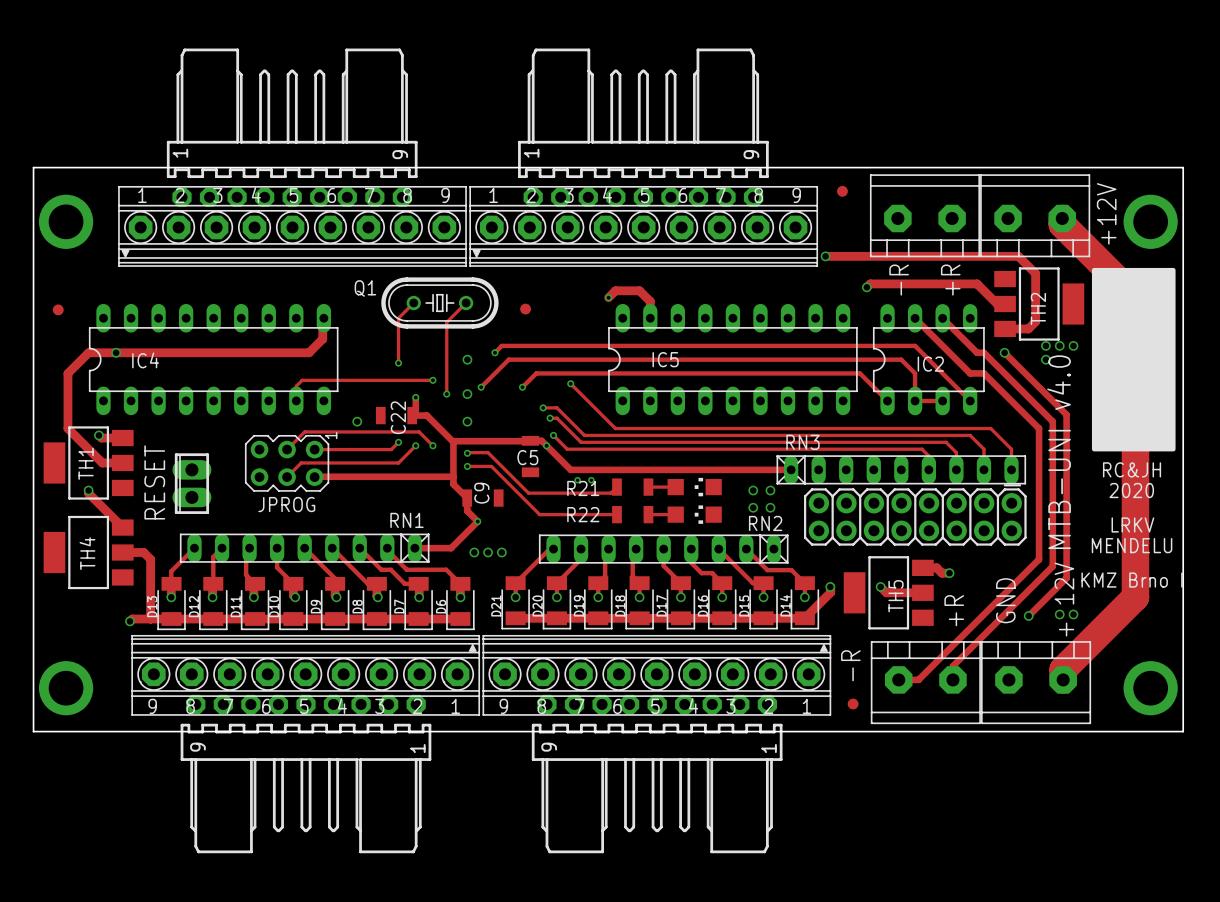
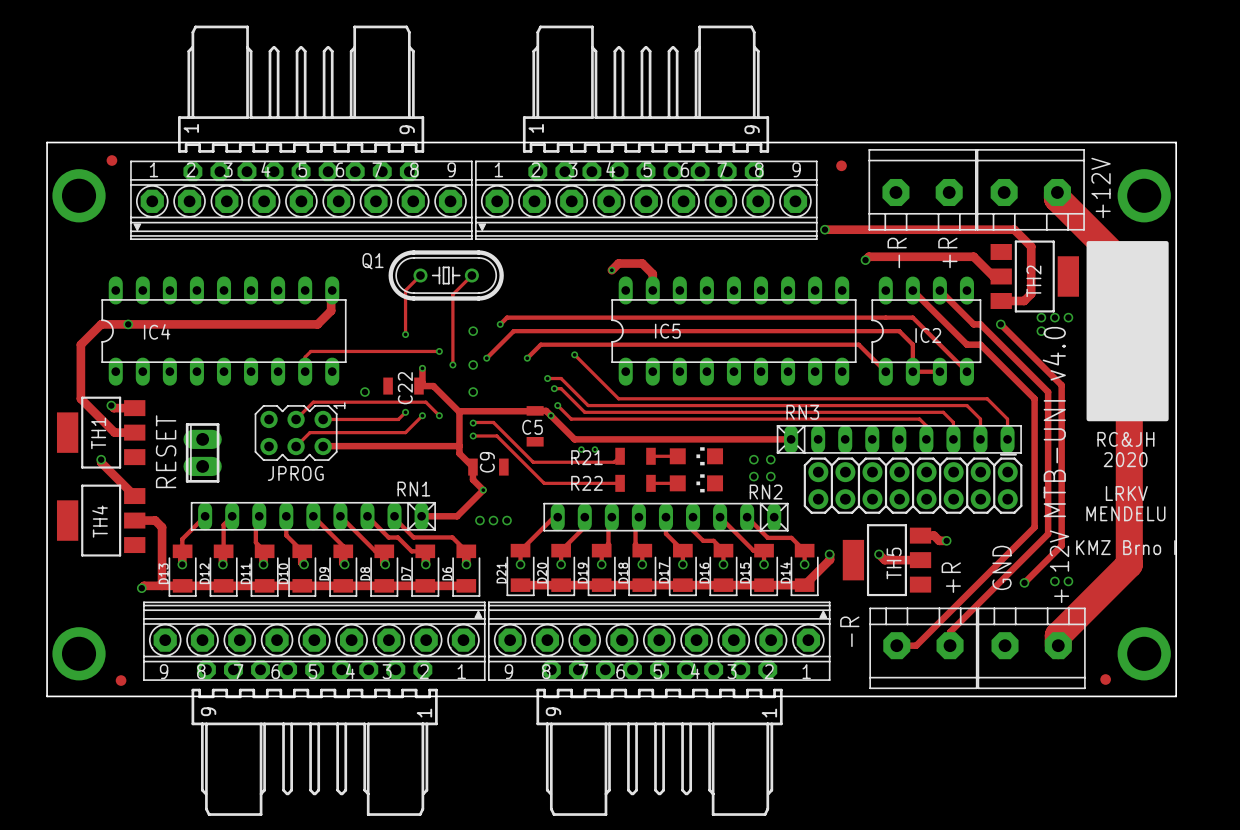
part position: (58, 309) -> (111, 160)
part: (525, 309) -> none
part position: (853, 704) -> (1105, 679)
part: none -> (121, 680)

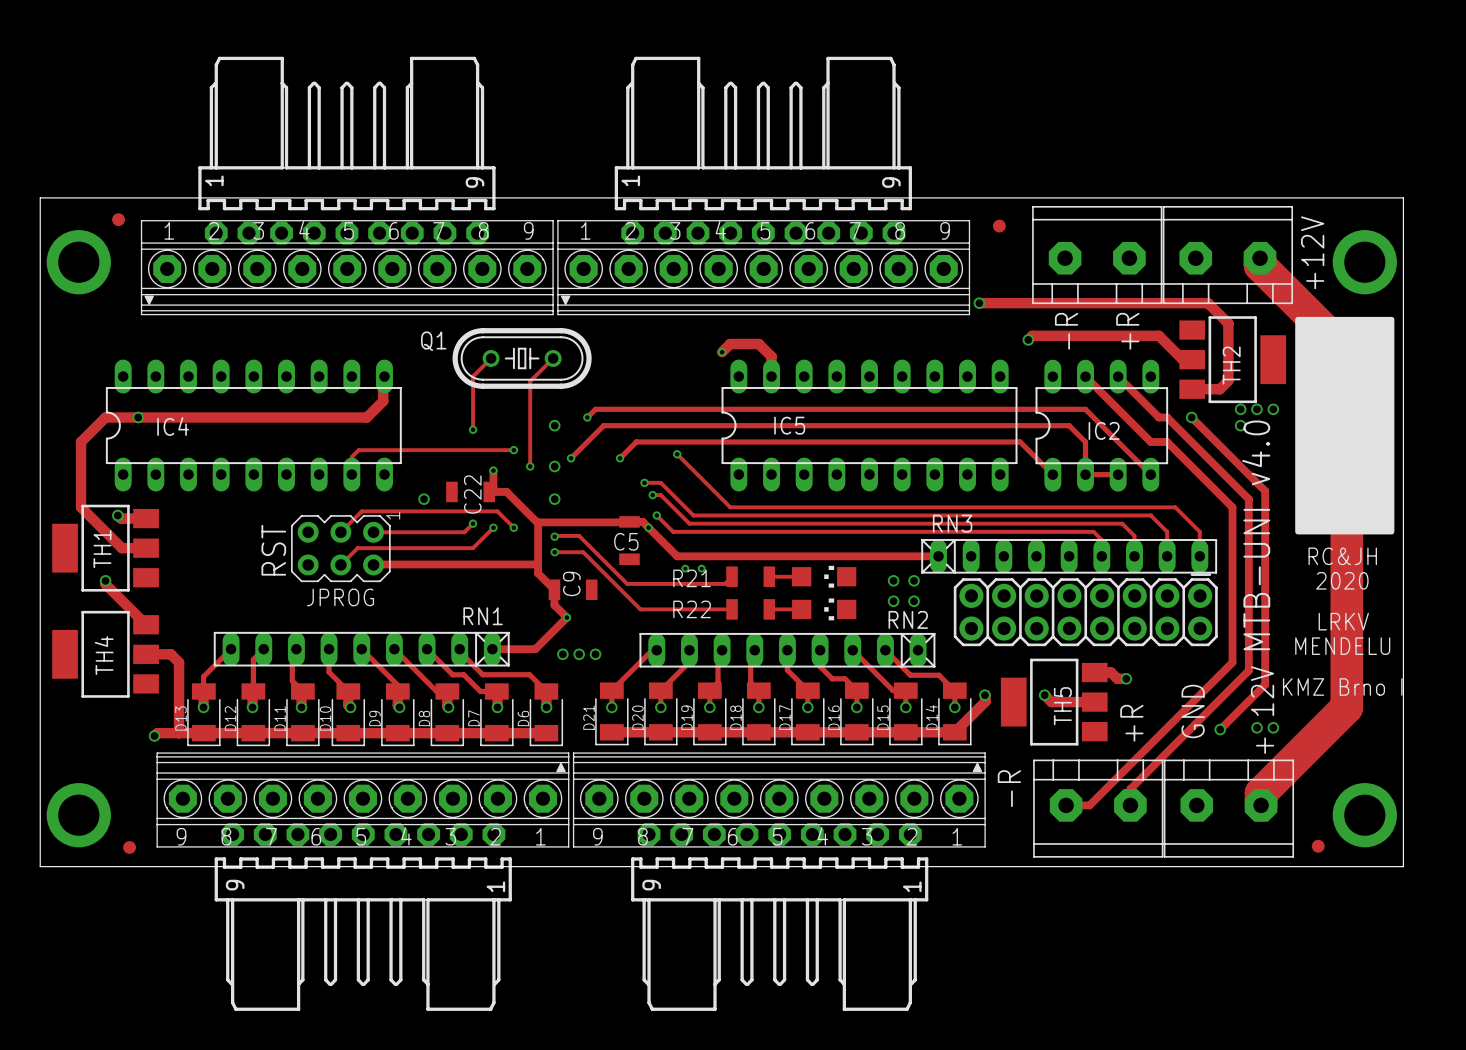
text: none -> RST (273, 550)
text: RESET (166, 451) -> none
part: (202, 452) -> none

